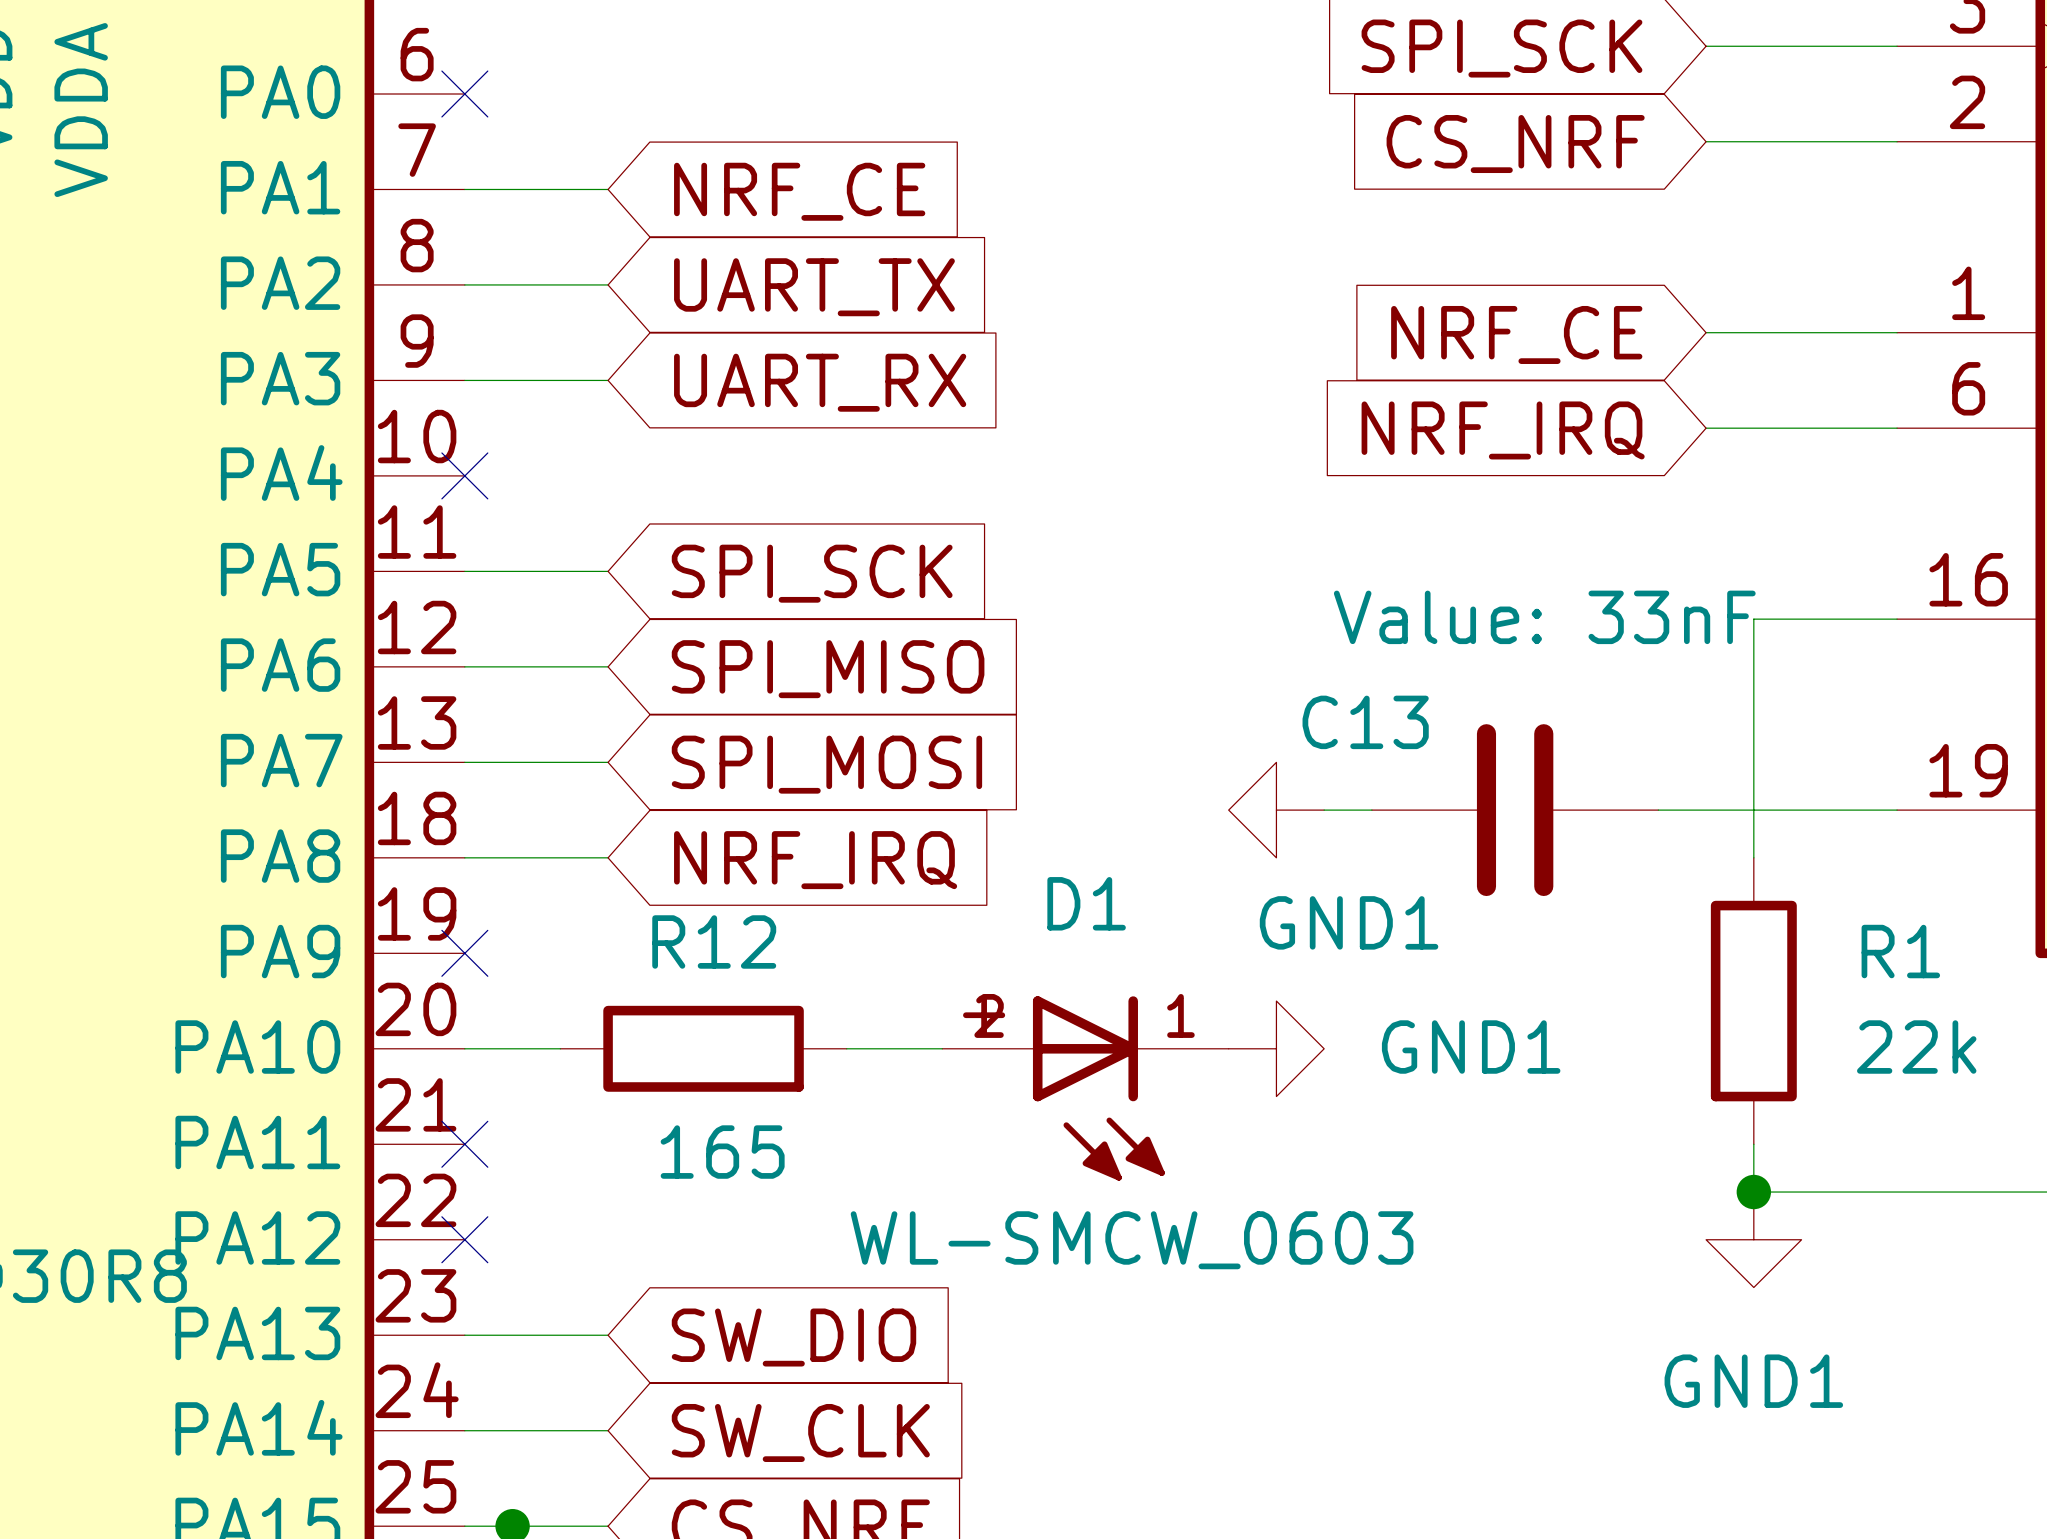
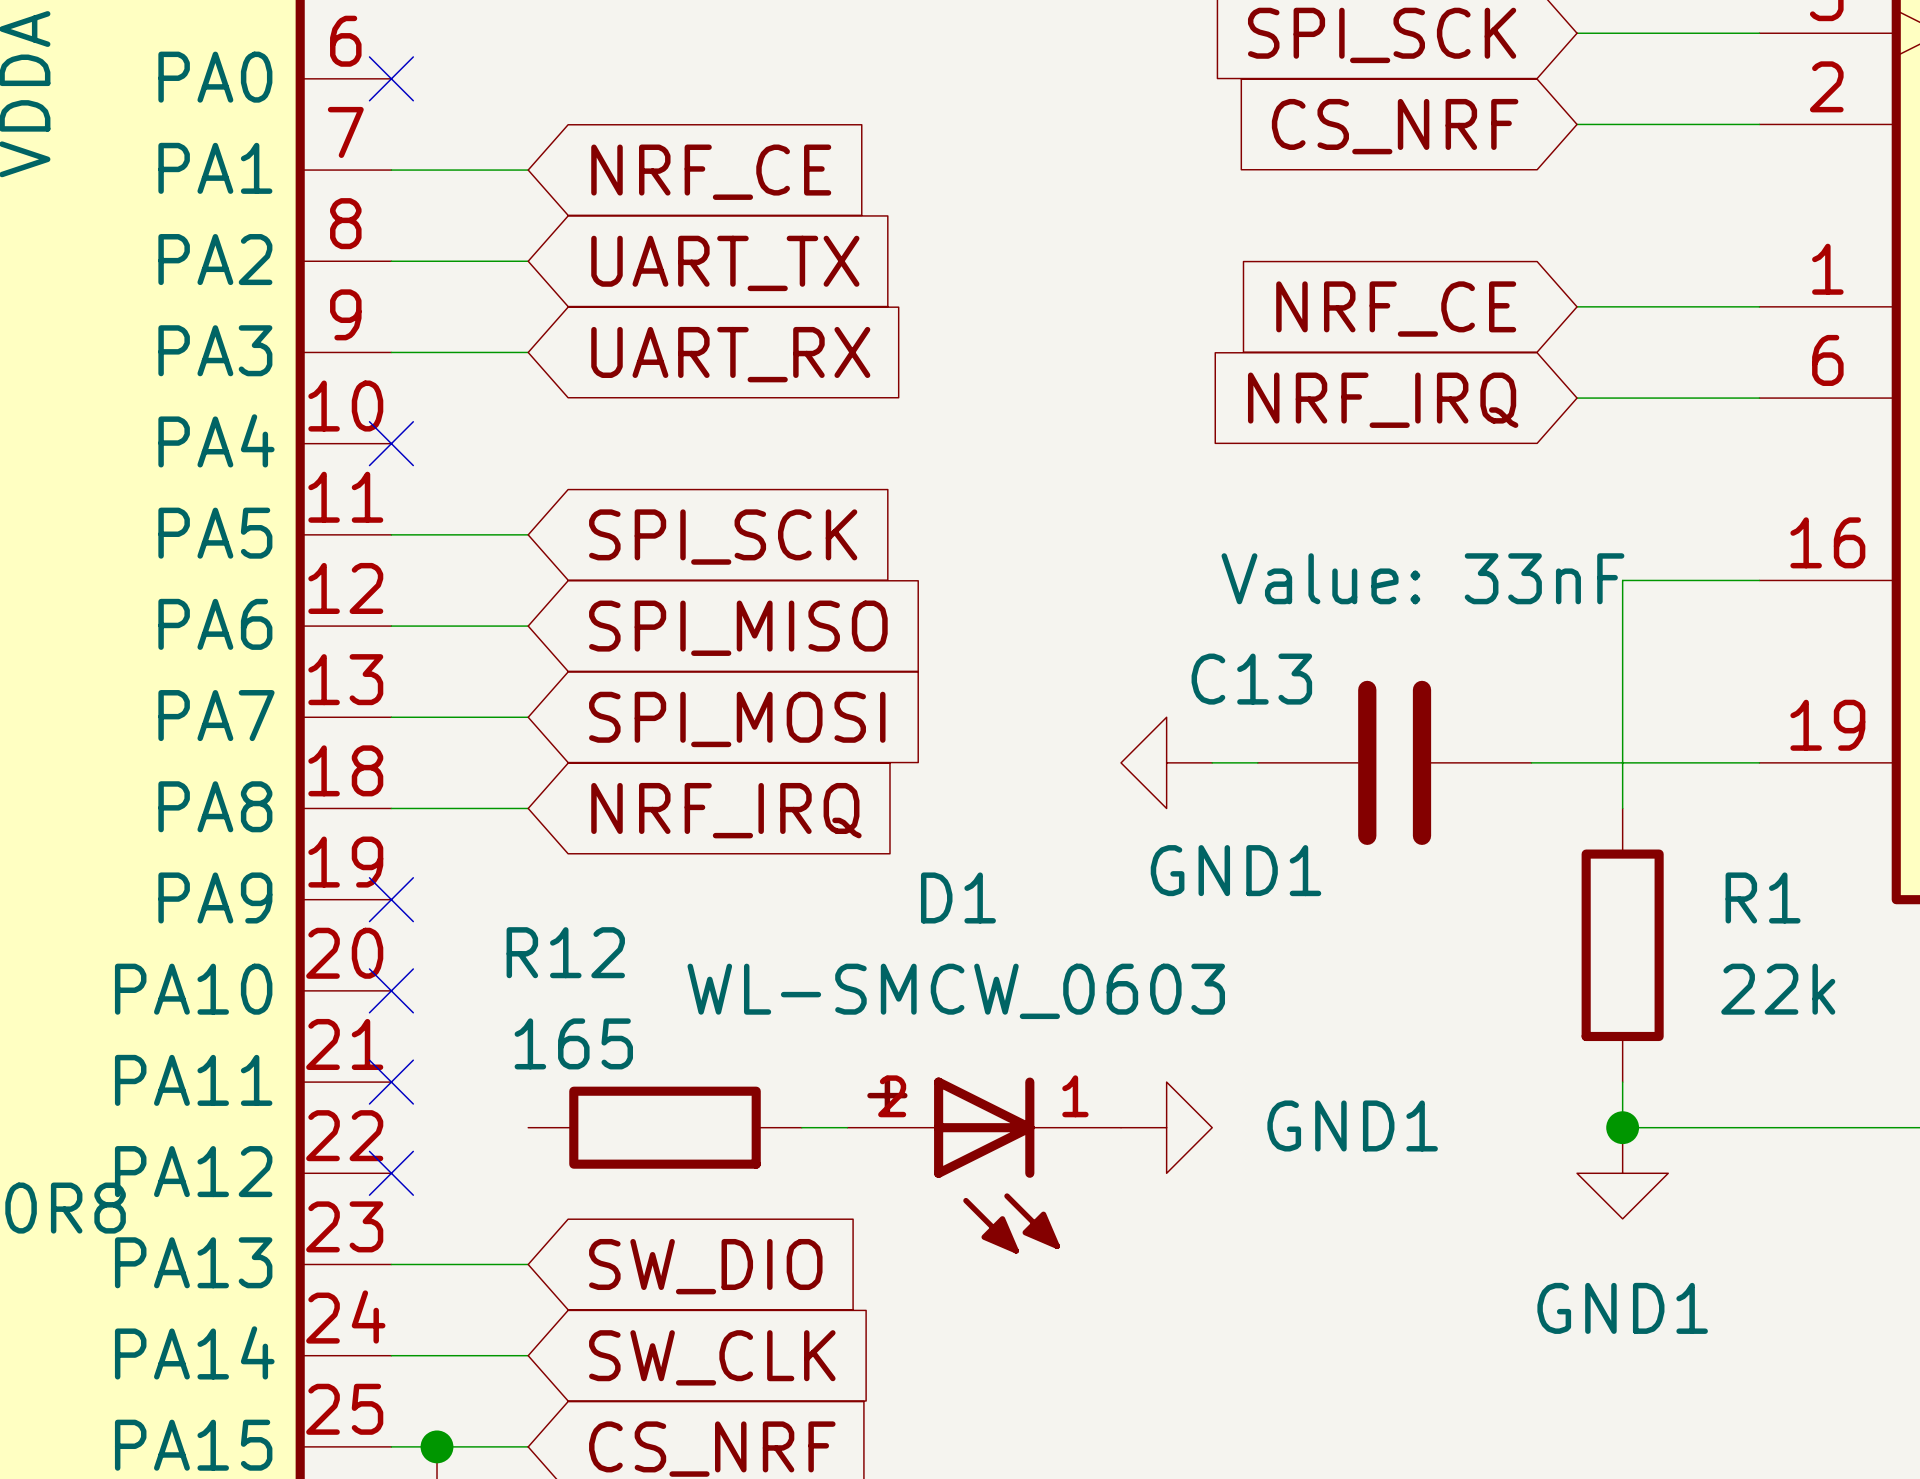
D1 name position: D1 (1086, 903) -> D1 (958, 897)
R12 name position: R12 (714, 941) -> R12 (565, 952)
wire: (464, 1048) (560, 1048) -> none
no-connect mark: none -> (391, 990)
R12 position: (703, 1048) -> (665, 1127)
wire: (846, 1048) (942, 1048) -> none
power symbol position: GND1 (1276, 1048) -> GND1 (1166, 1127)
D1 position: (1085, 1088) -> (984, 1165)
R12 value position: 165 (722, 1152) -> 165 (573, 1043)
wire: none -> (801, 1127) (847, 1127)
D1 value position: WL-SMCW_0603 (1132, 1240) -> WL-SMCW_0603 (956, 991)

